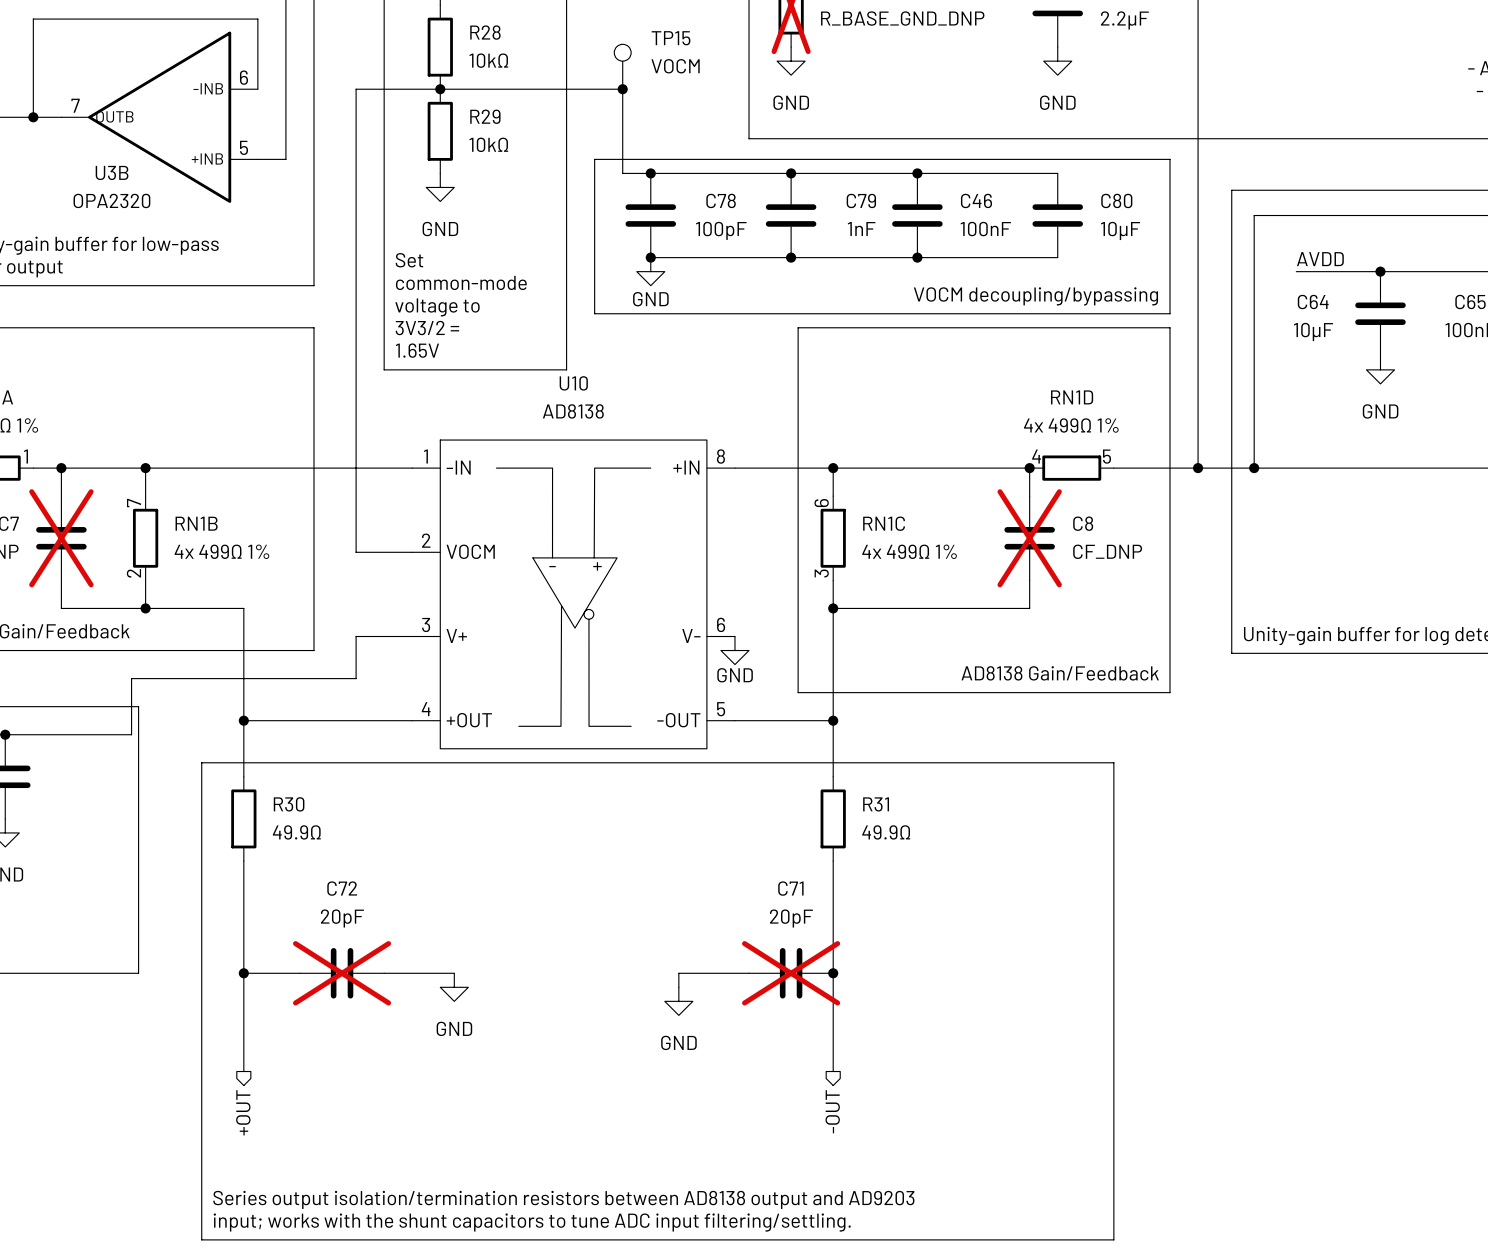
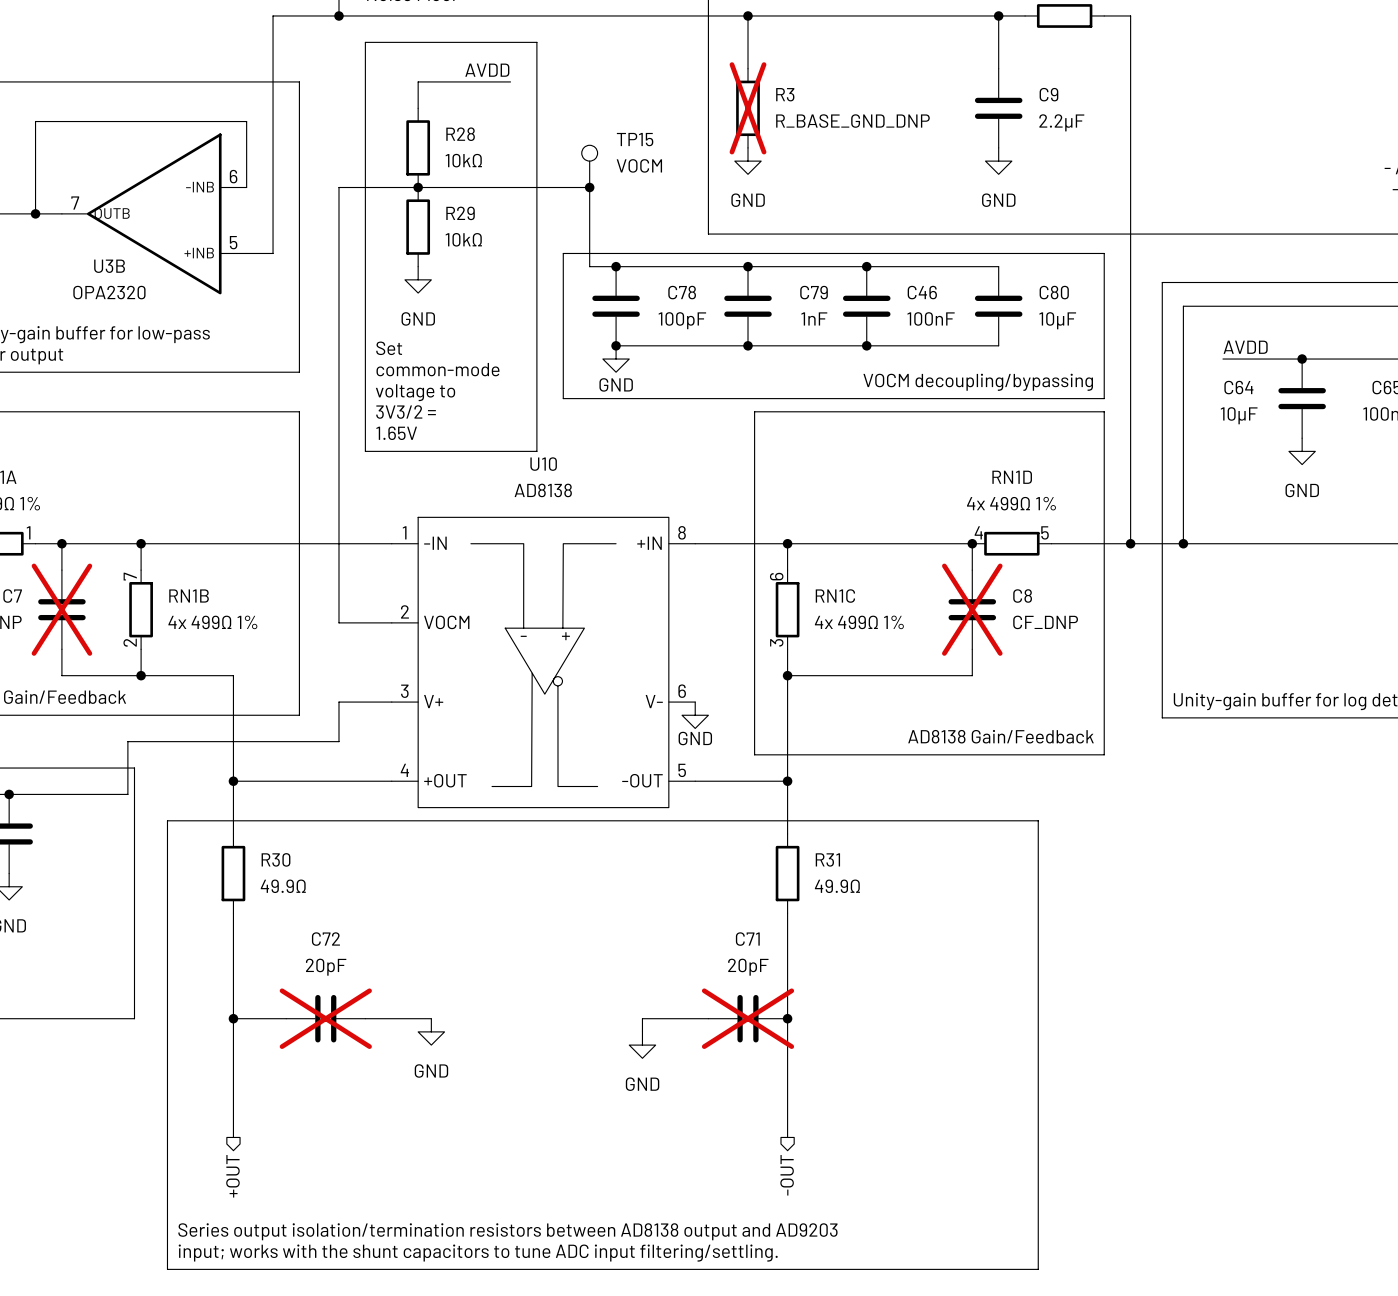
line: (201, 762) (201, 1239) -> (193, 820) (167, 820) (167, 1269) (193, 1269)
line: (1099, 762) (1113, 762) (1113, 1239) (1099, 1239) -> (1038, 820) (1038, 1269)
wire: none -> (233, 1111) (233, 1137)
wire: none -> (787, 1111) (787, 1137)
hierarchical label position: -OUT (832, 1111) -> -OUT (787, 1175)
hierarchical label position: +OUT (243, 1112) -> +OUT (232, 1176)
text position: Series output isolation/termination resistors between AD8138 output and AD9203 (563, 1199) -> Series output isolation/termination resistors between AD8138 output and AD9203 (507, 1231)
text position: input; works with the shunt capacitors to tune ADC input filtering/settling. (532, 1222) -> input; works with the shunt capacitors to tune ADC input filtering/settling. (478, 1253)

